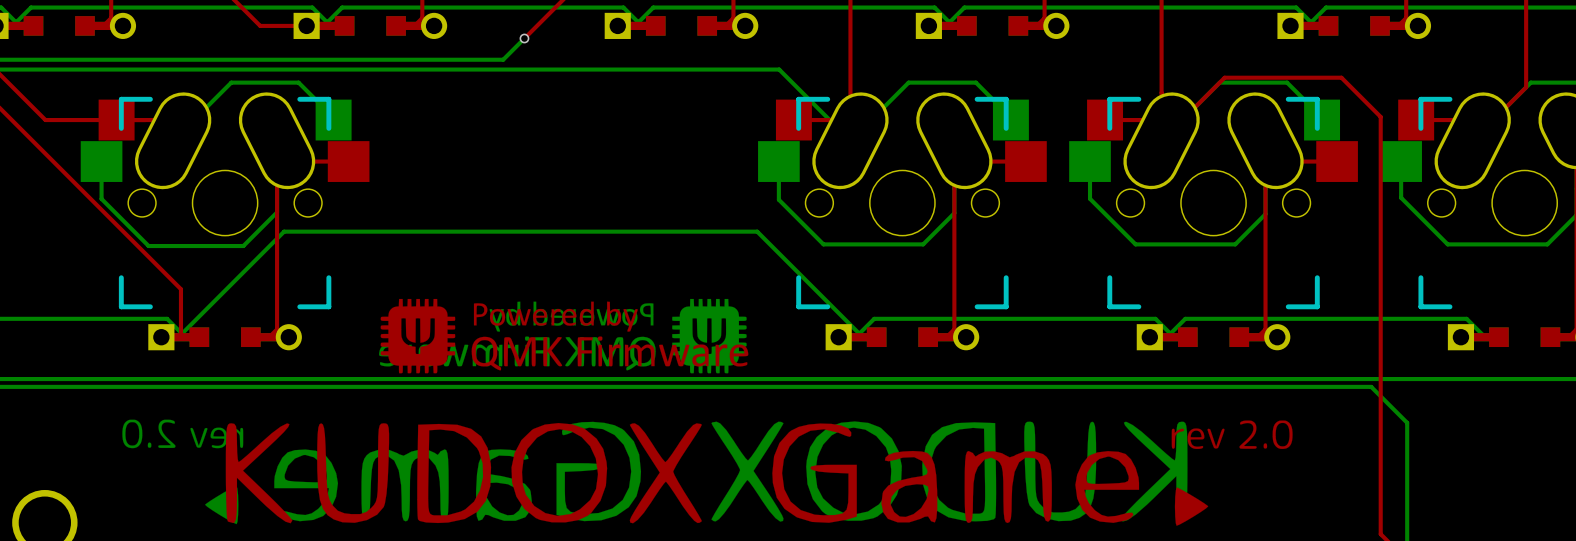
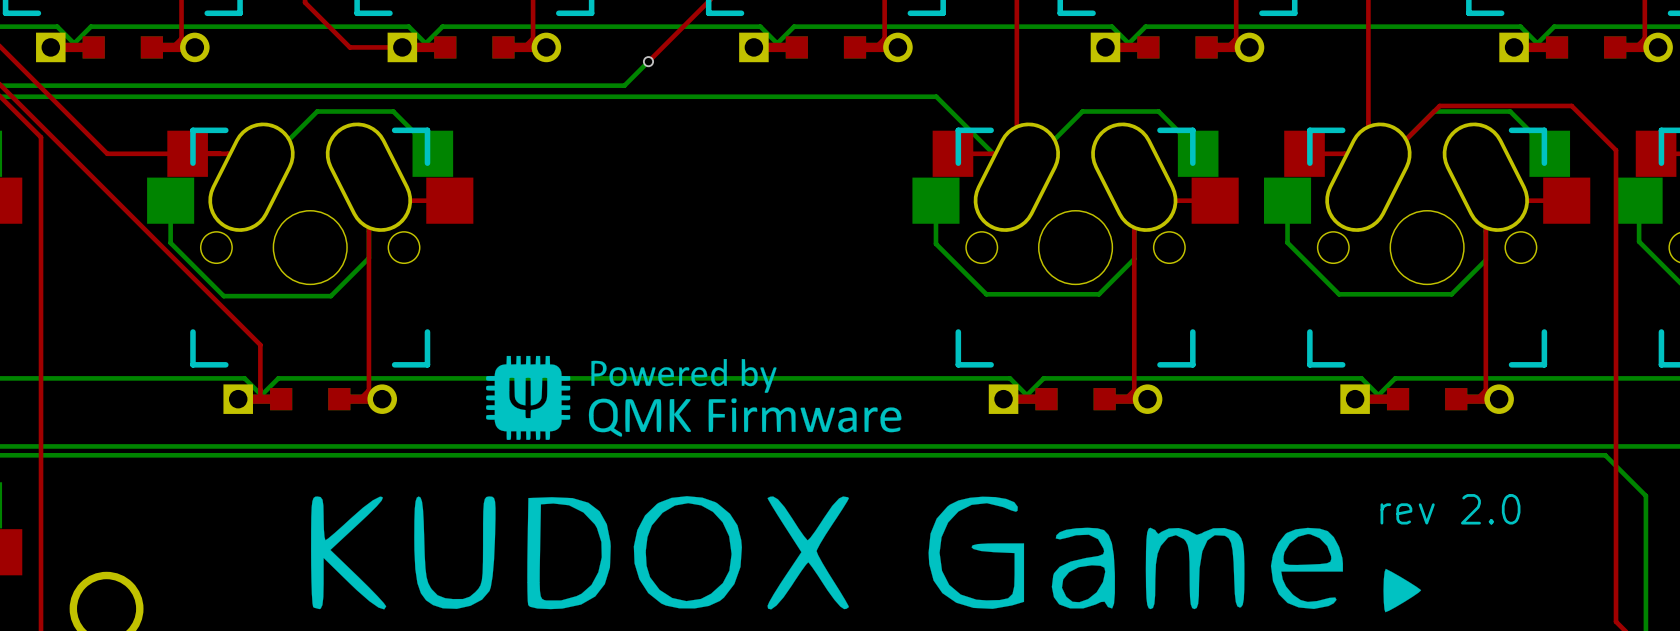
drawing: [379, 298, 747, 374] -> none
drawing shape: [380, 298, 749, 374] -> [486, 355, 902, 440]
bottom track: (196, 318) (284, 231) (757, 231) (844, 318) -> (278, 378) (1010, 378)
drawing: [122, 419, 1293, 525] -> none
drawing shape: [225, 423, 1209, 526] -> [311, 496, 1422, 613]
text: none -> rev 2.0 (1450, 509)

